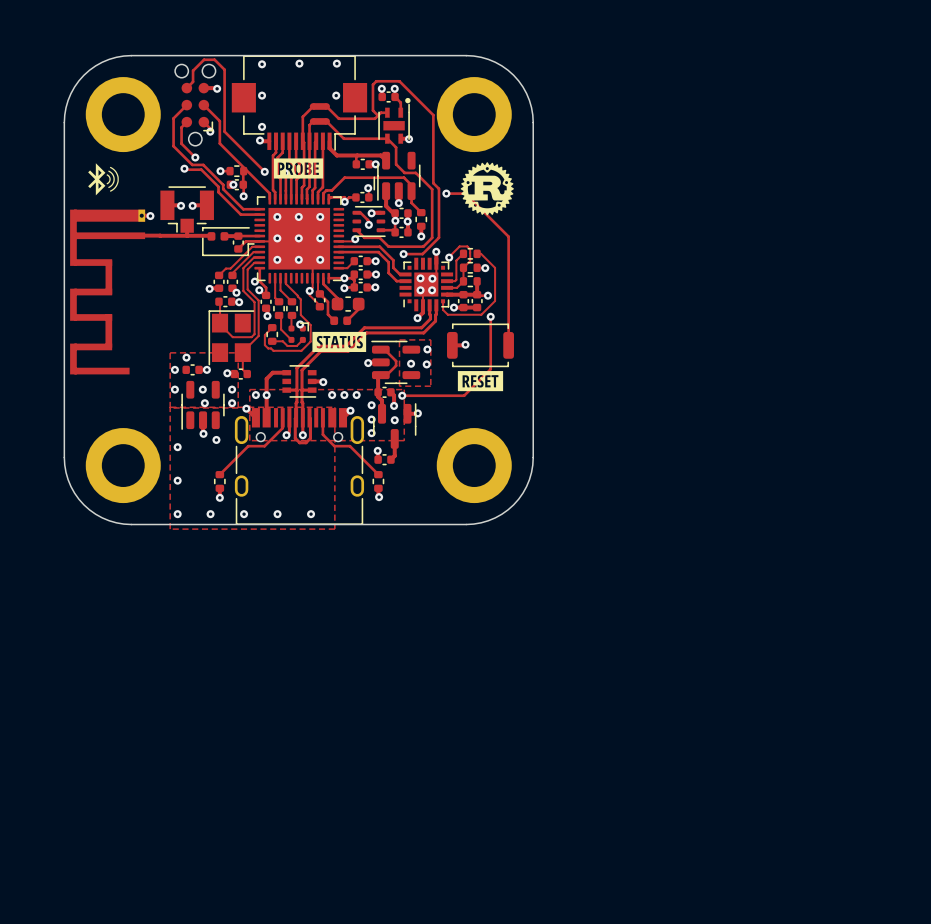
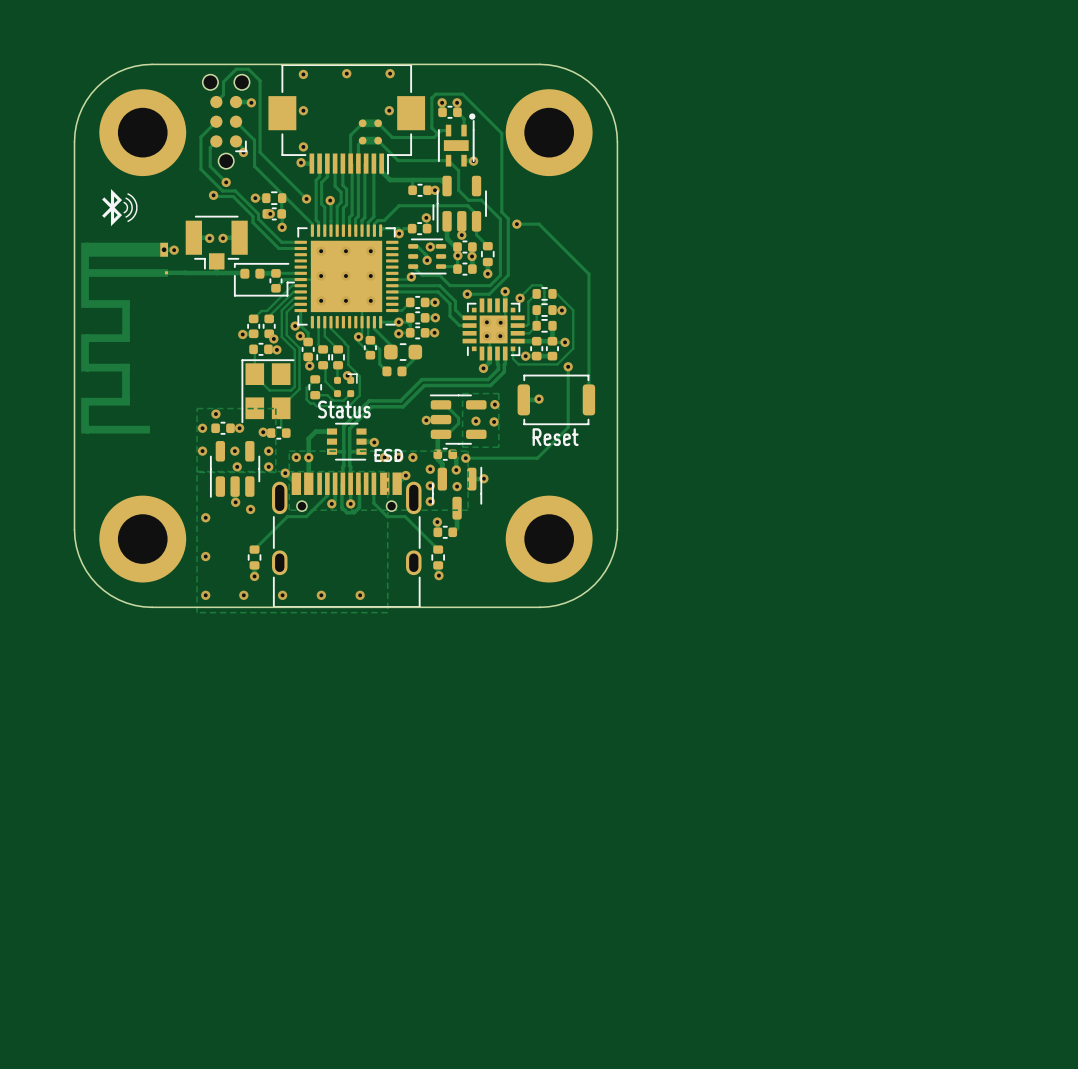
drawing: [273, 158, 324, 179] -> none
drawing: [460, 162, 514, 216] -> none
drawing: [312, 331, 367, 353] -> none
text: none -> Status (344, 409)
drawing: [457, 371, 504, 392] -> none
text: none -> Reset (555, 437)
text: none -> ESD (388, 455)

